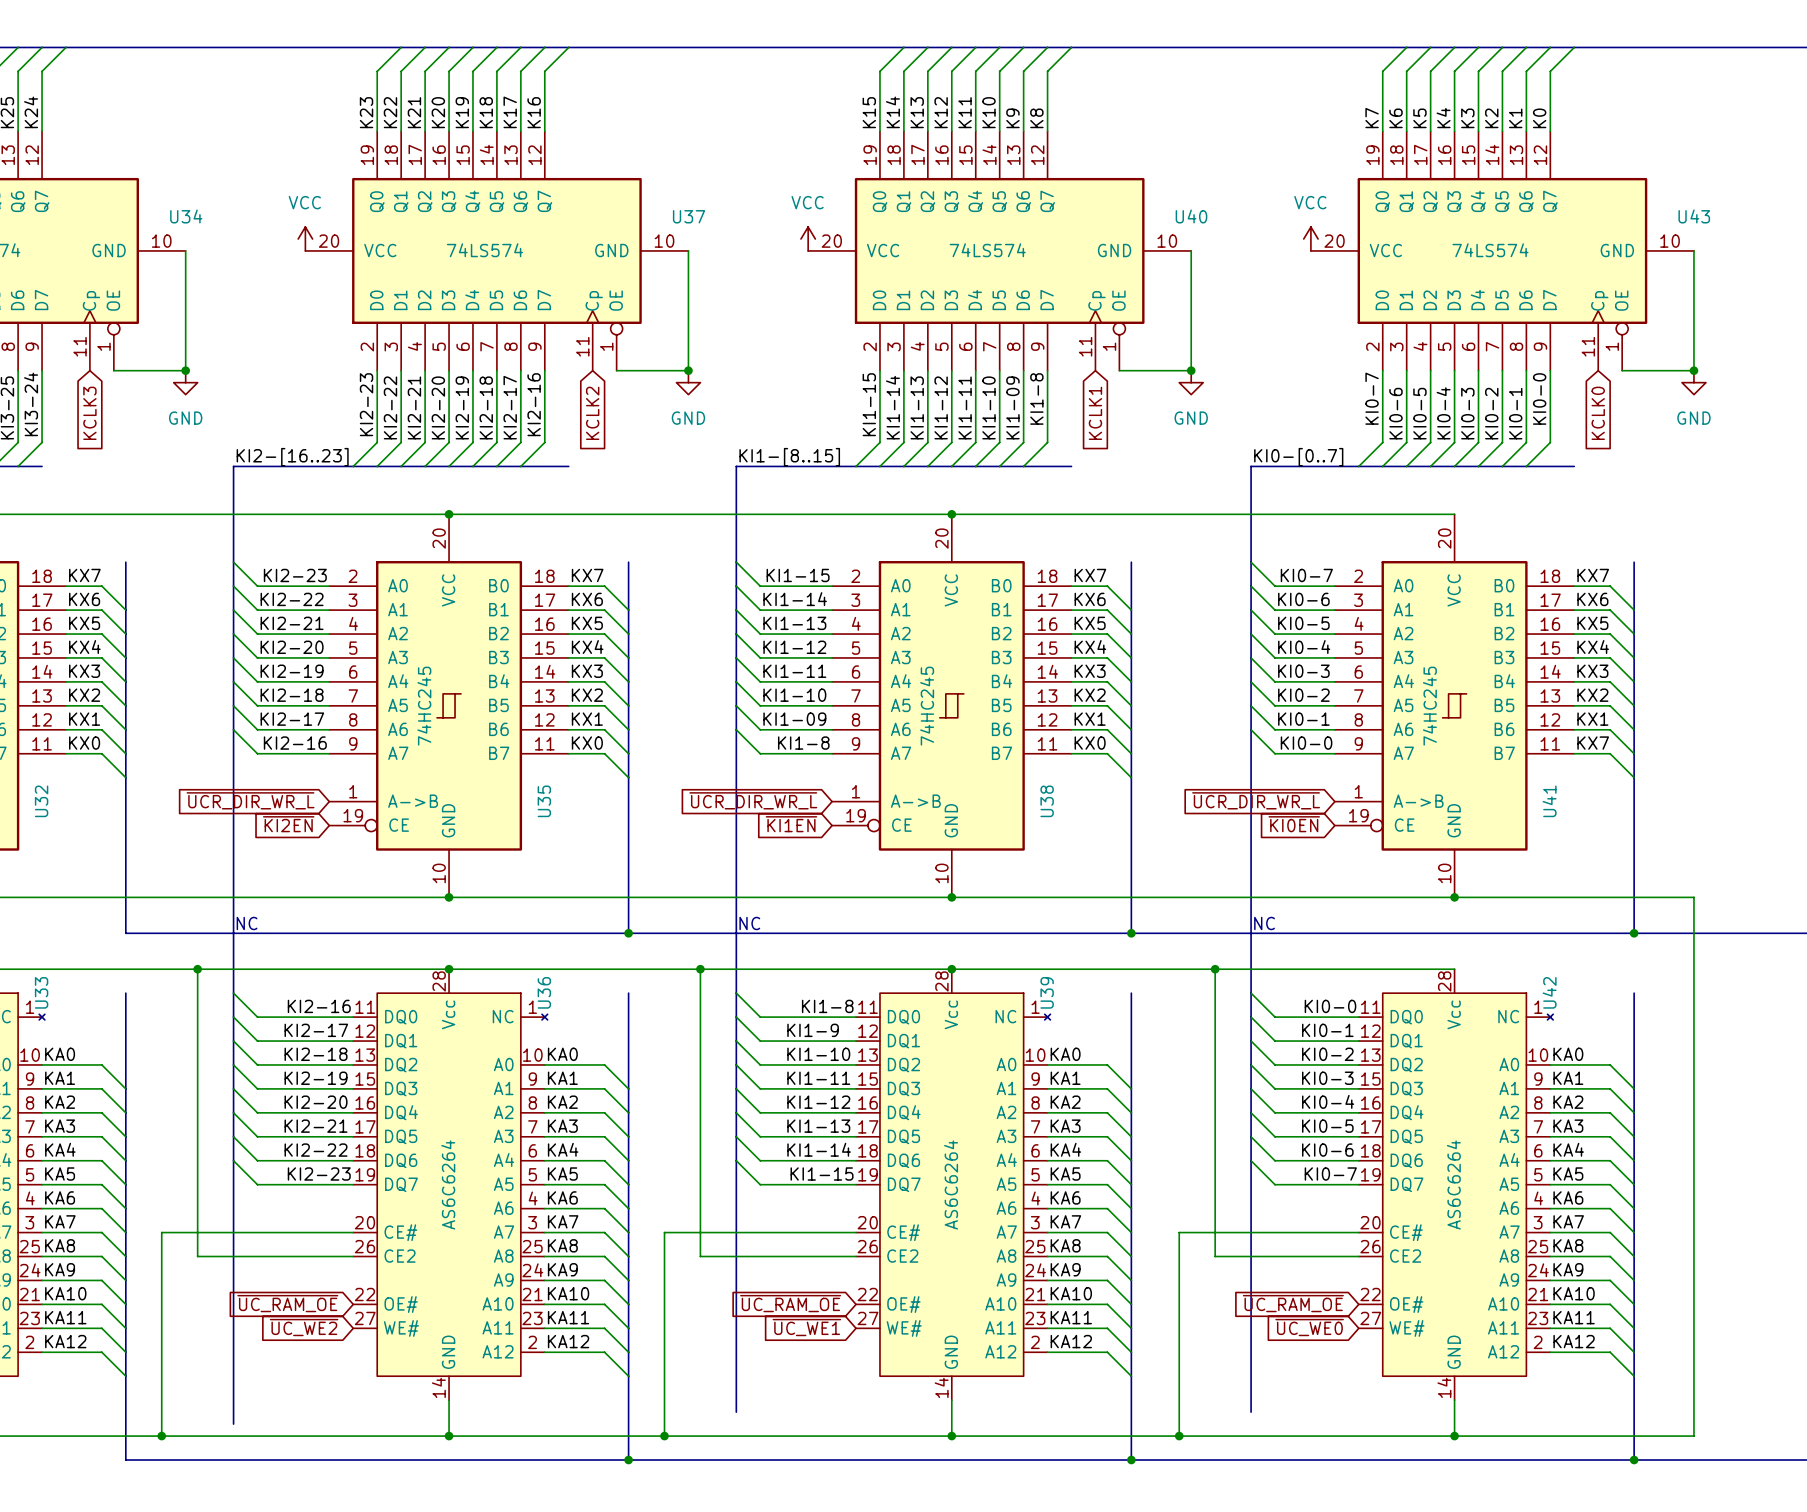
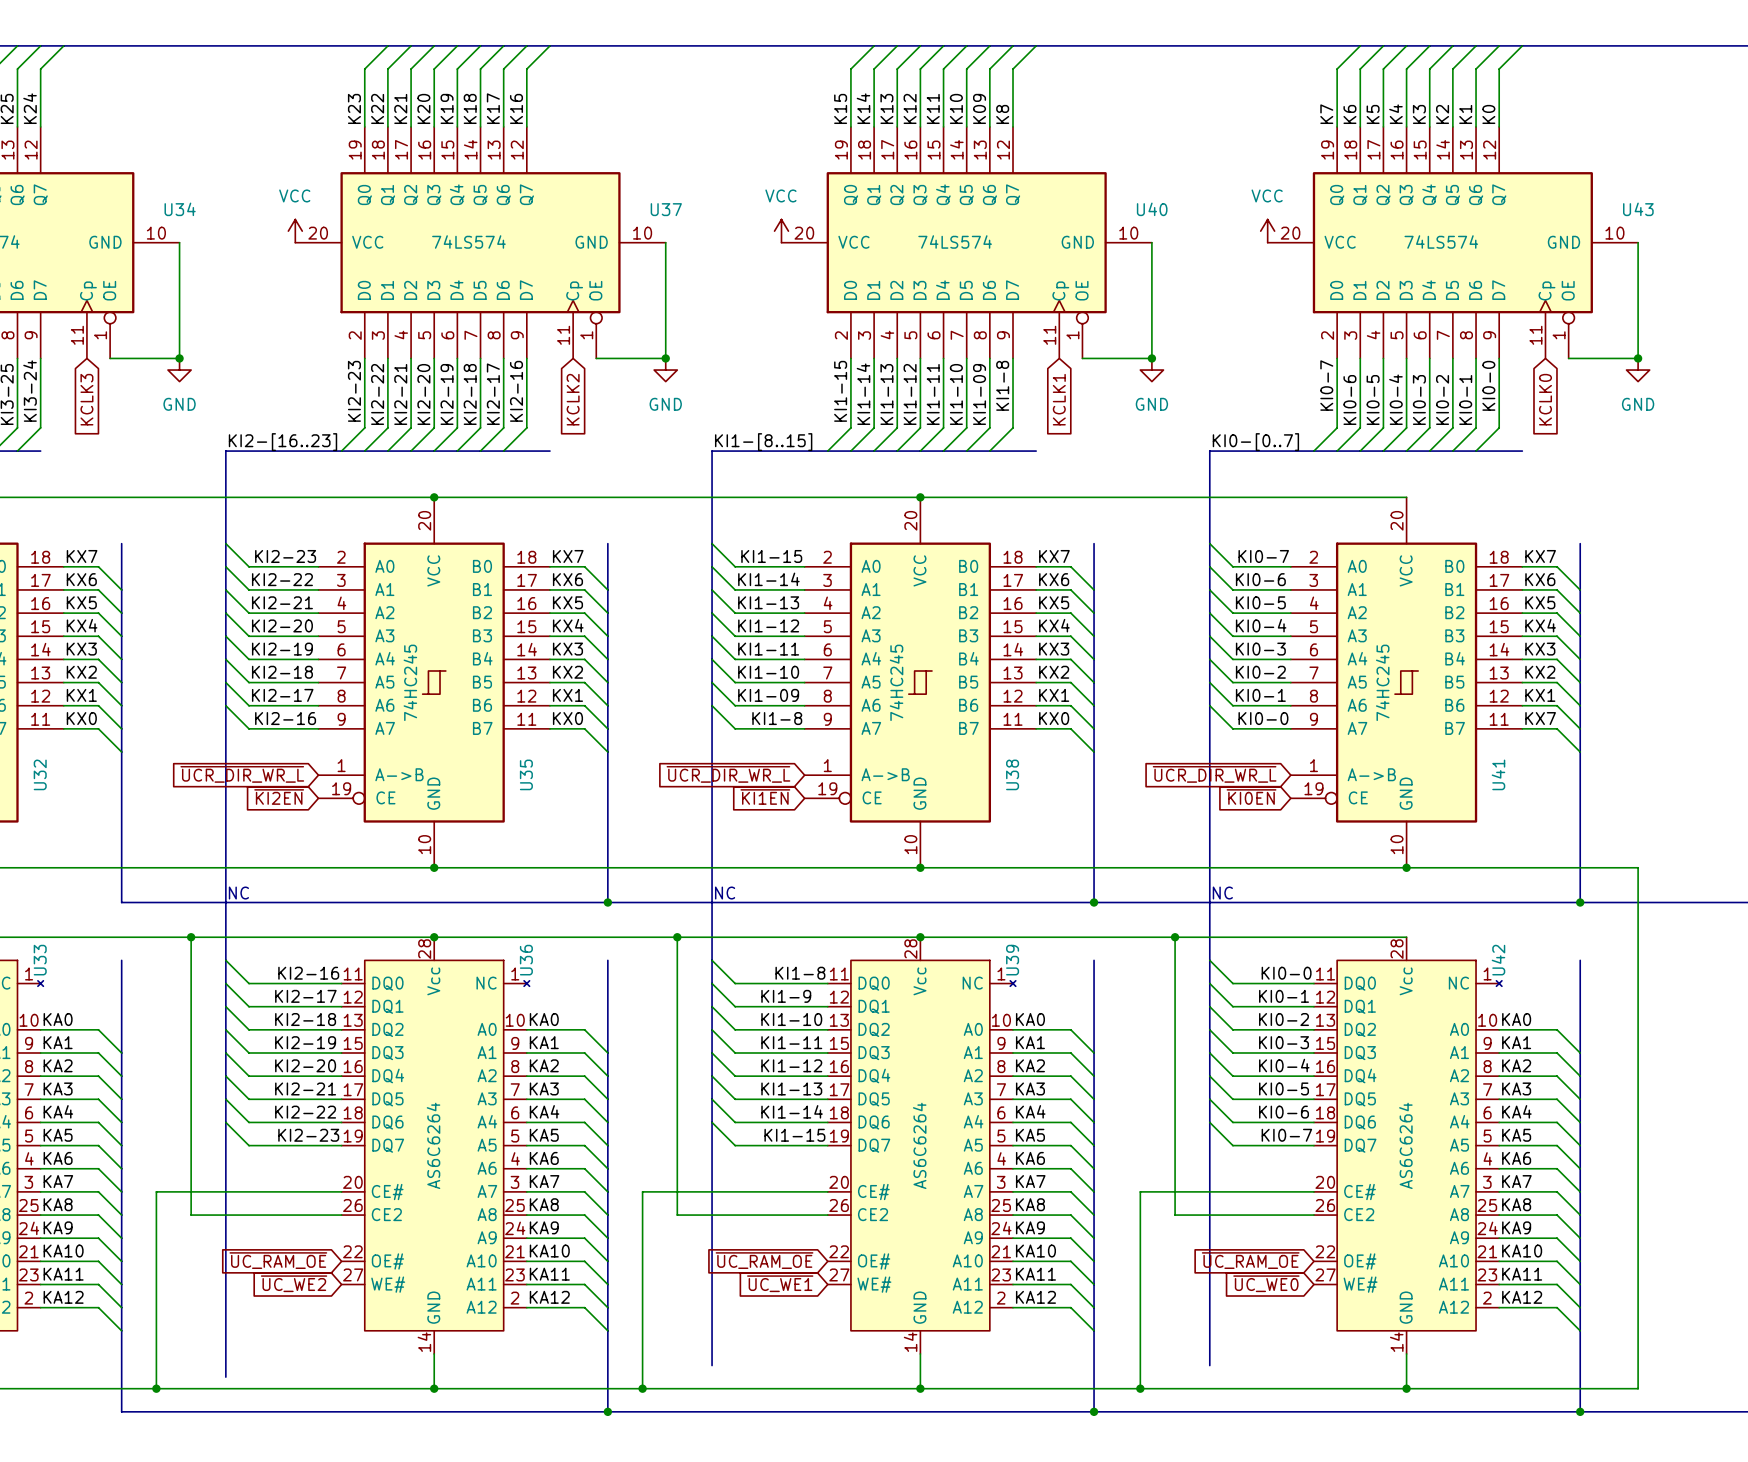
label: K9 (1012, 118) -> K09 (979, 108)

